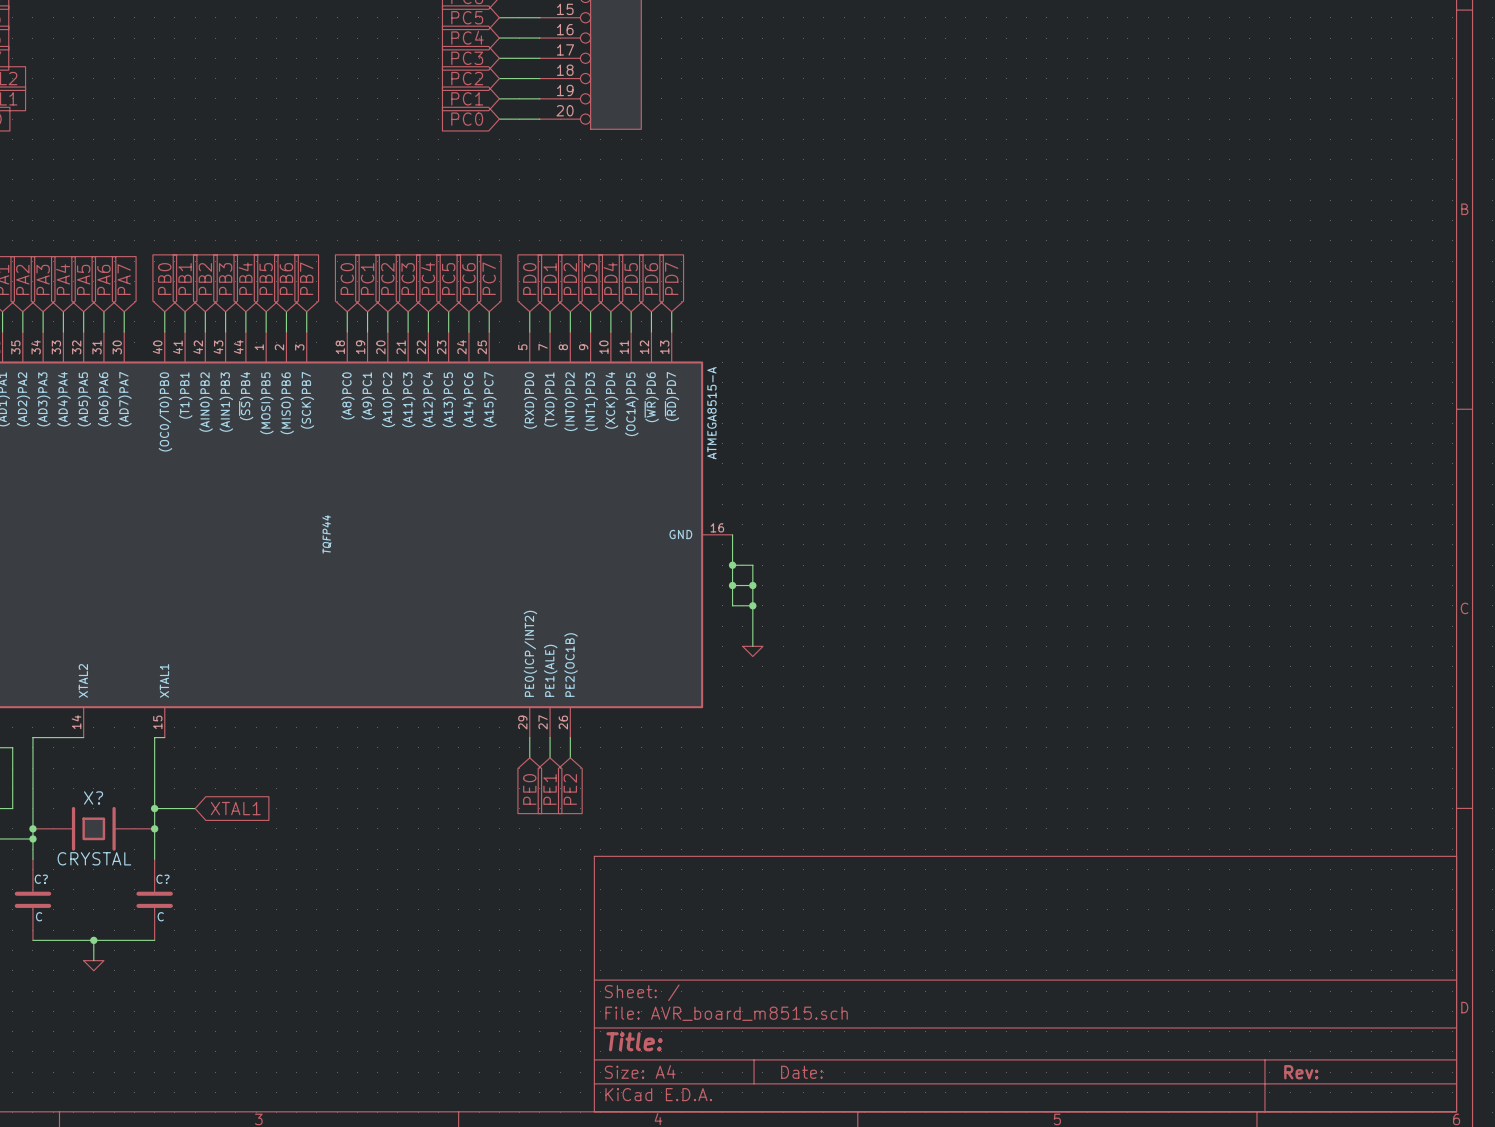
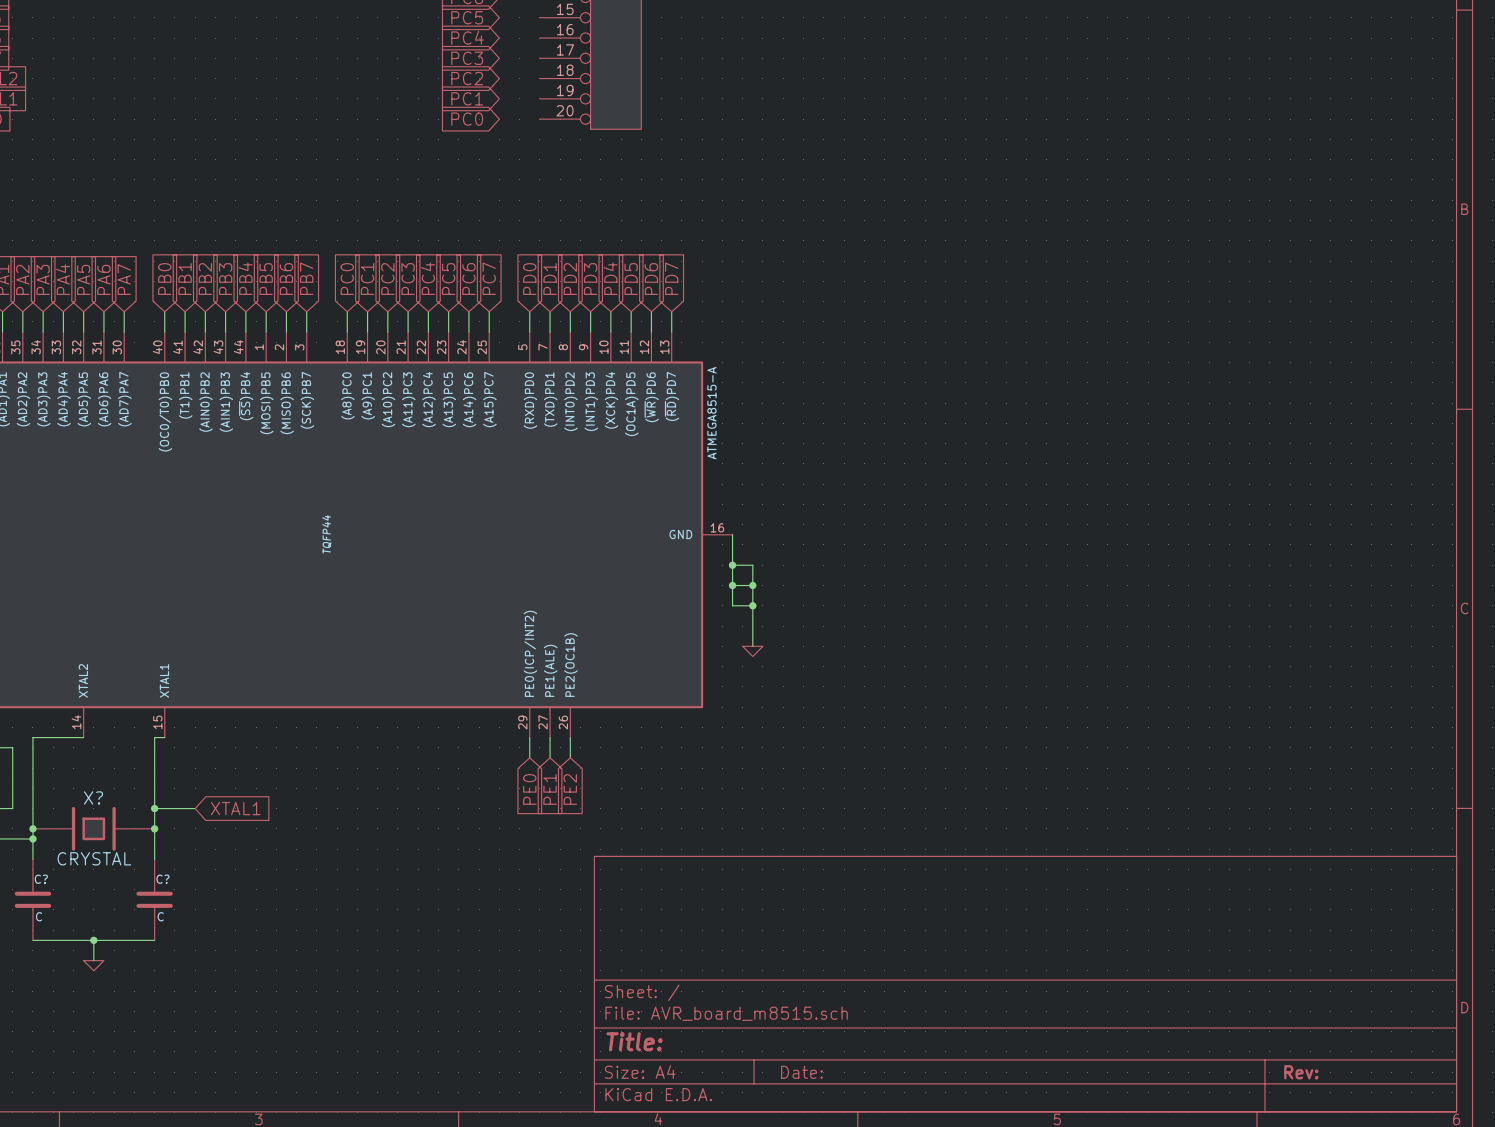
wire: (499, 17) (539, 17) -> none
wire: (499, 38) (539, 38) -> none
wire: (499, 58) (539, 58) -> none
wire: (499, 78) (539, 78) -> none
wire: (499, 98) (539, 98) -> none
wire: (499, 119) (539, 119) -> none

